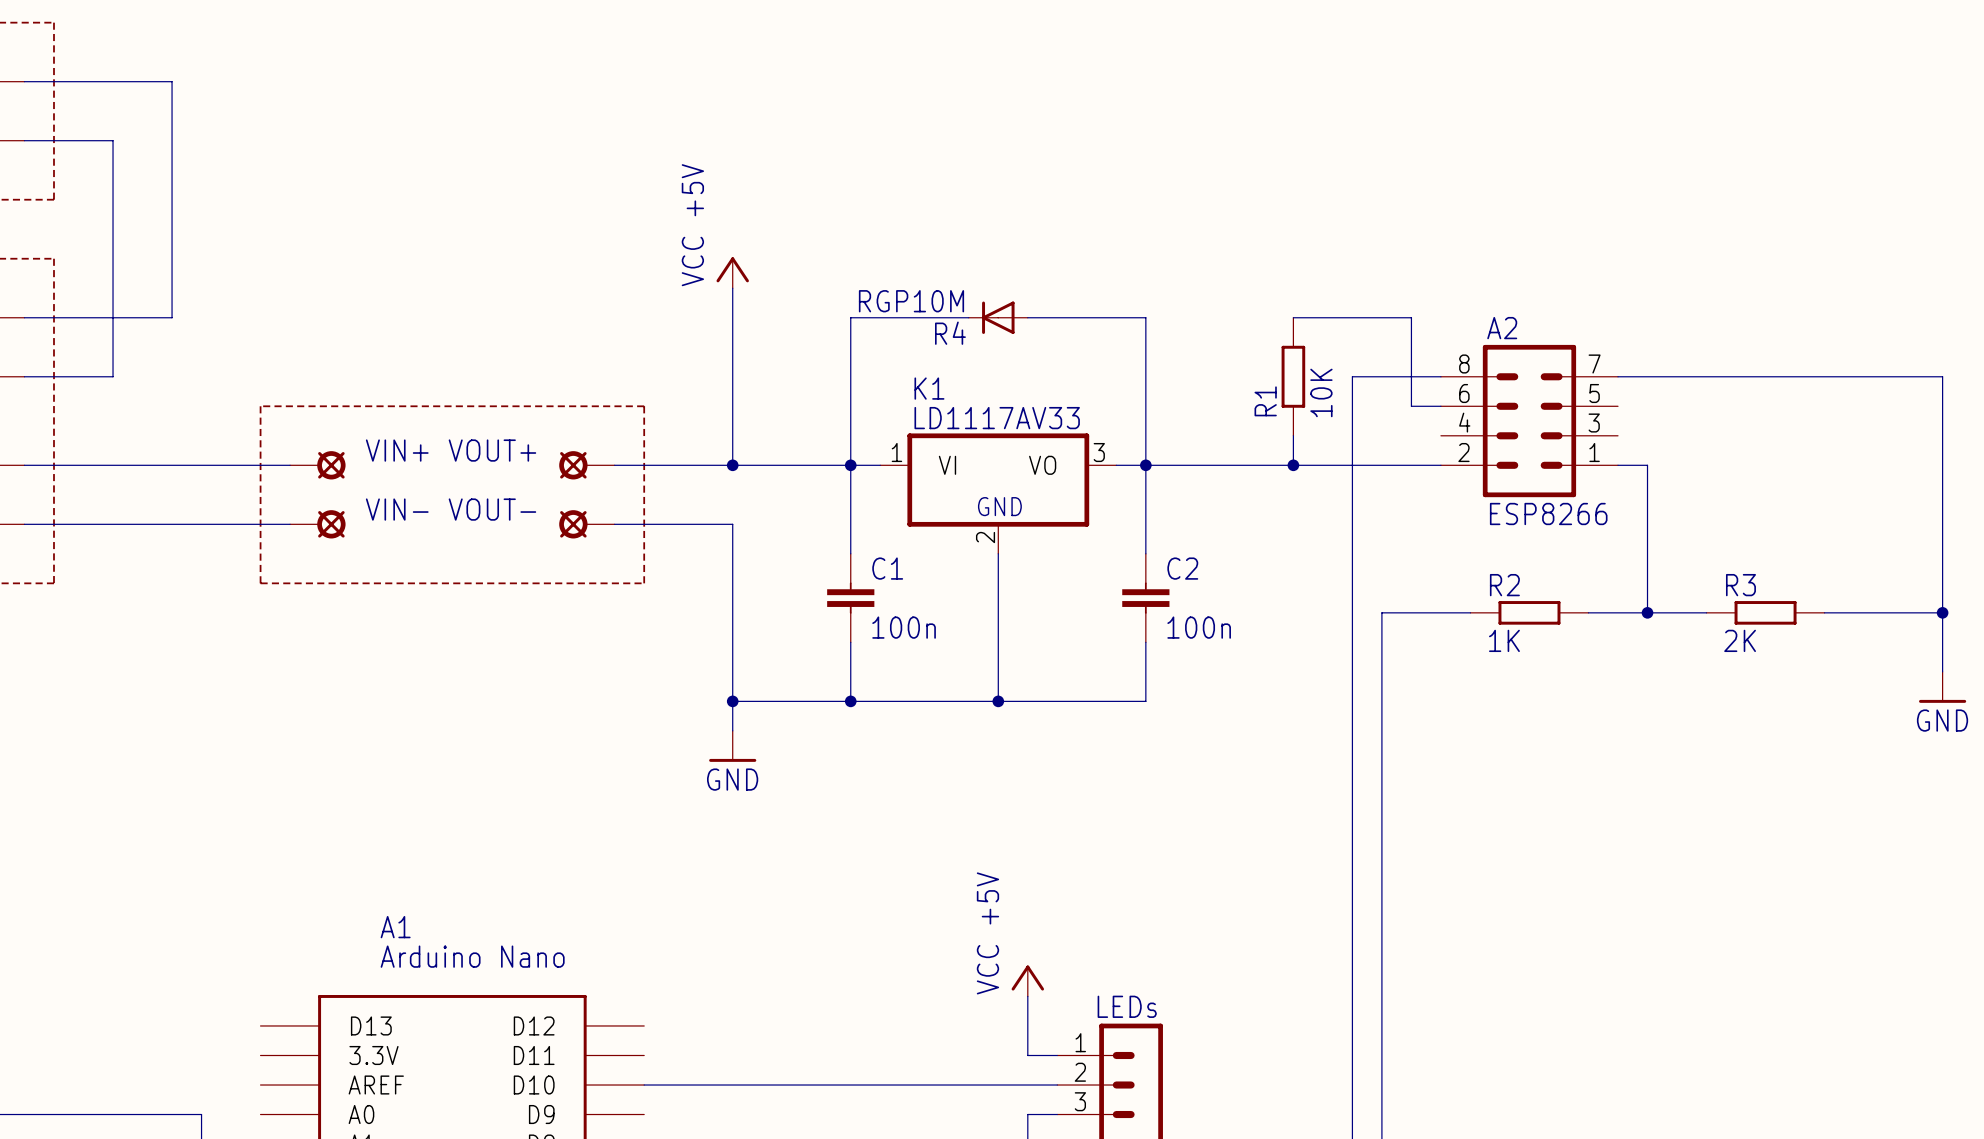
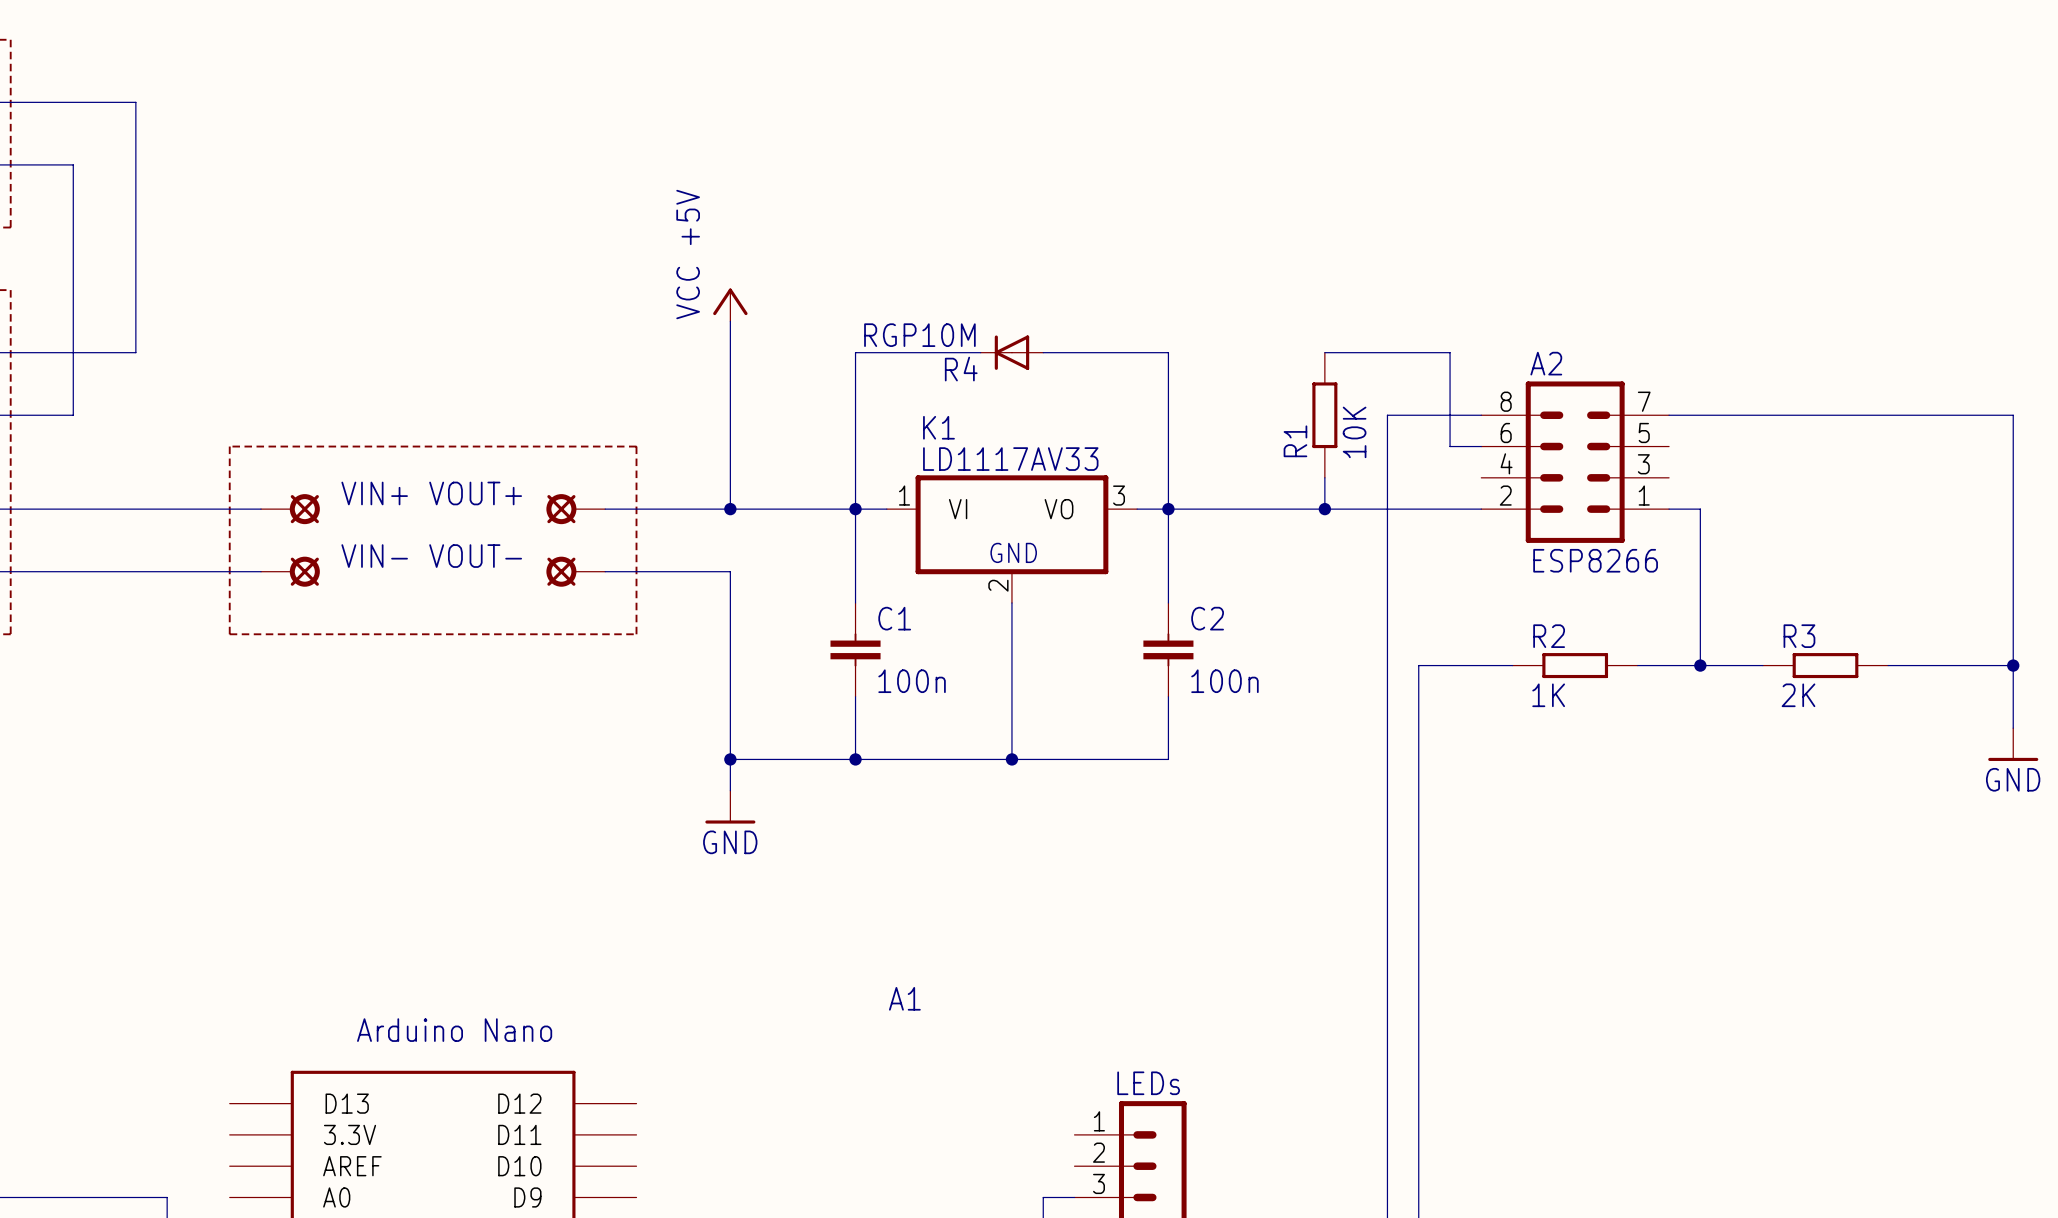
text: A1 (395, 927) -> none
text: none -> A1 (904, 998)
power symbol: VCC +5V (1027, 980) -> none
wire: (1027, 996) (1027, 1055) (1057, 1055) -> none
wire: (644, 1085) (1057, 1085) -> none

